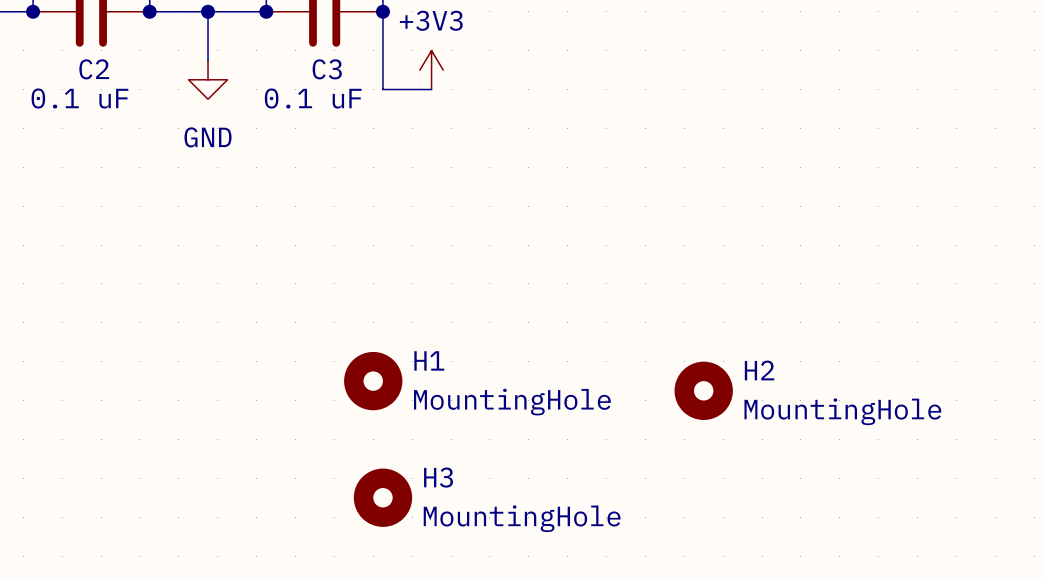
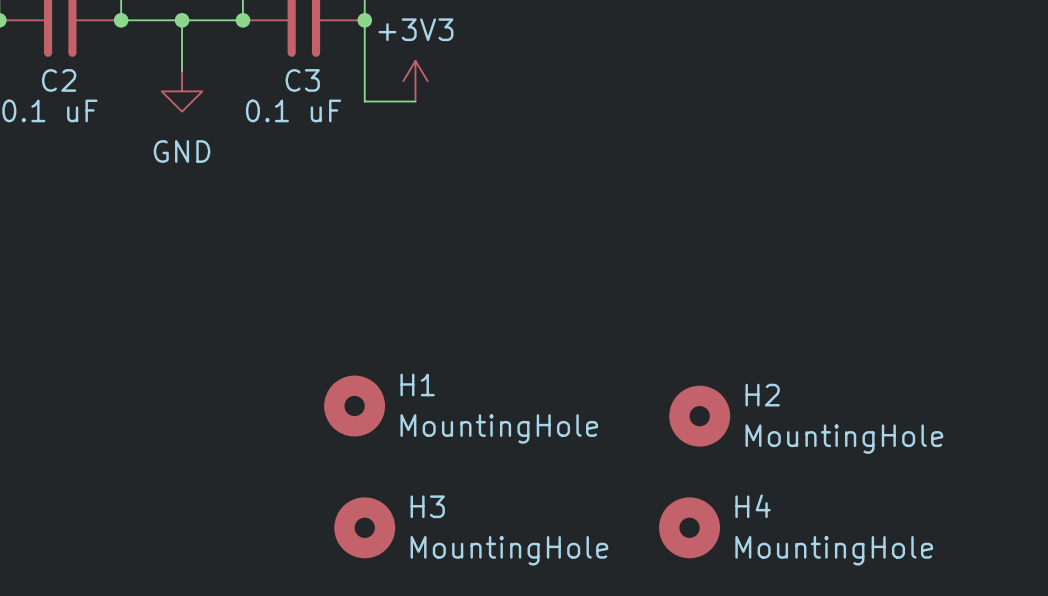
H4: none -> MountingHole (689, 527)

